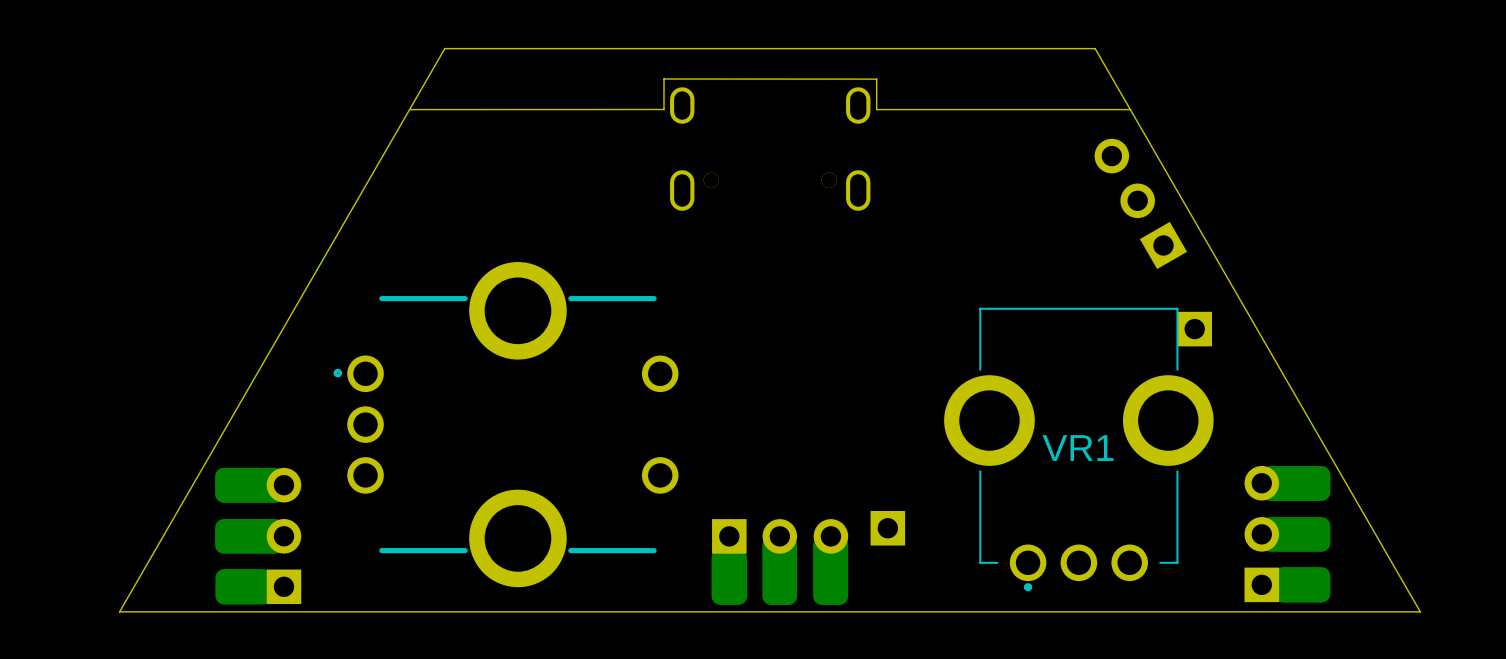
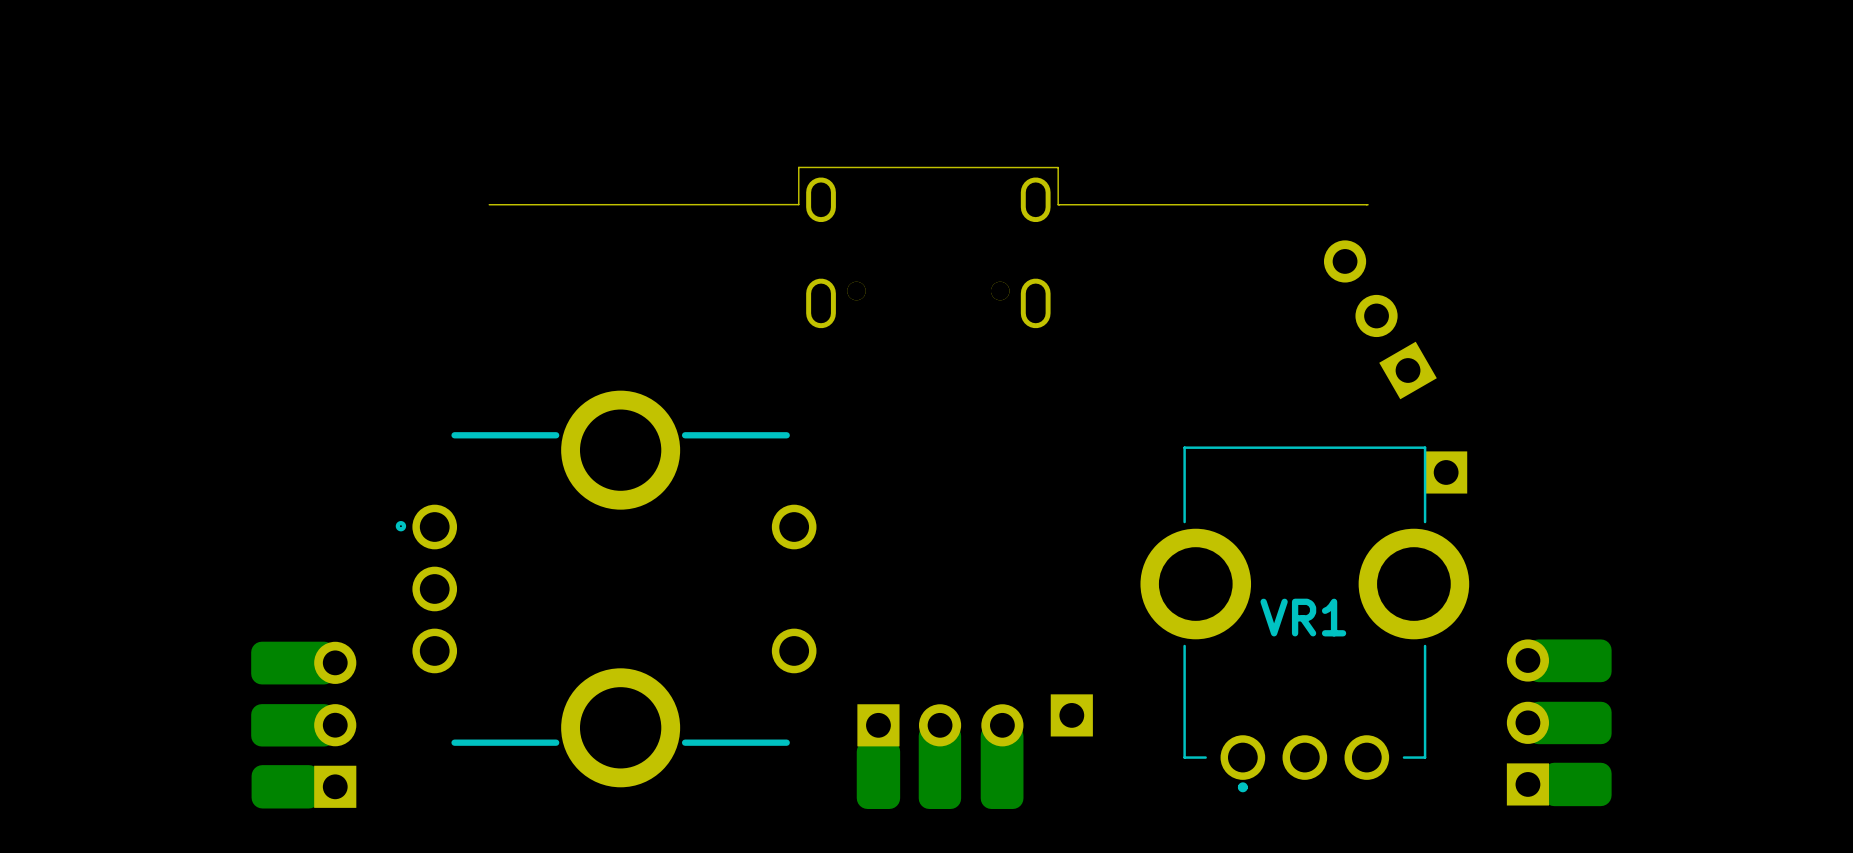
board edge: (1095, 48) (1420, 611) (119, 611) (444, 48) (1095, 48) -> none

